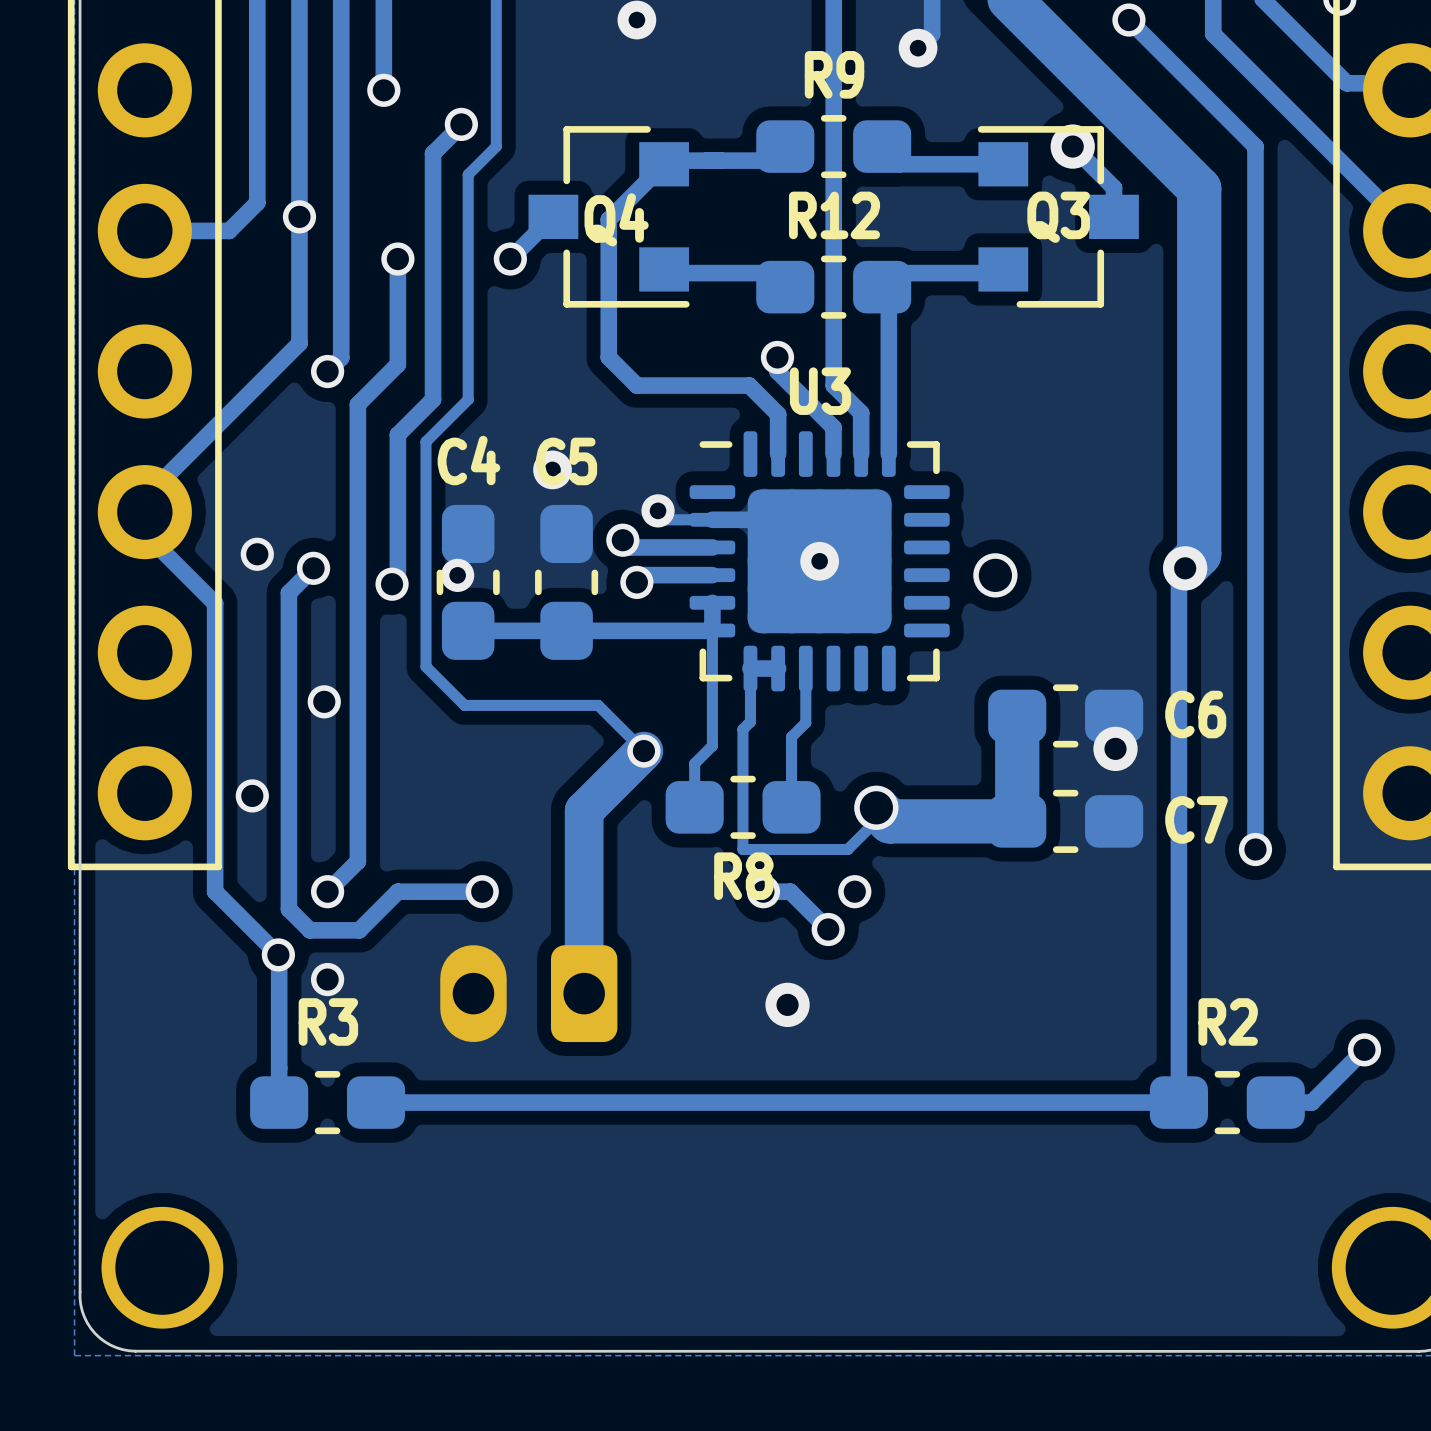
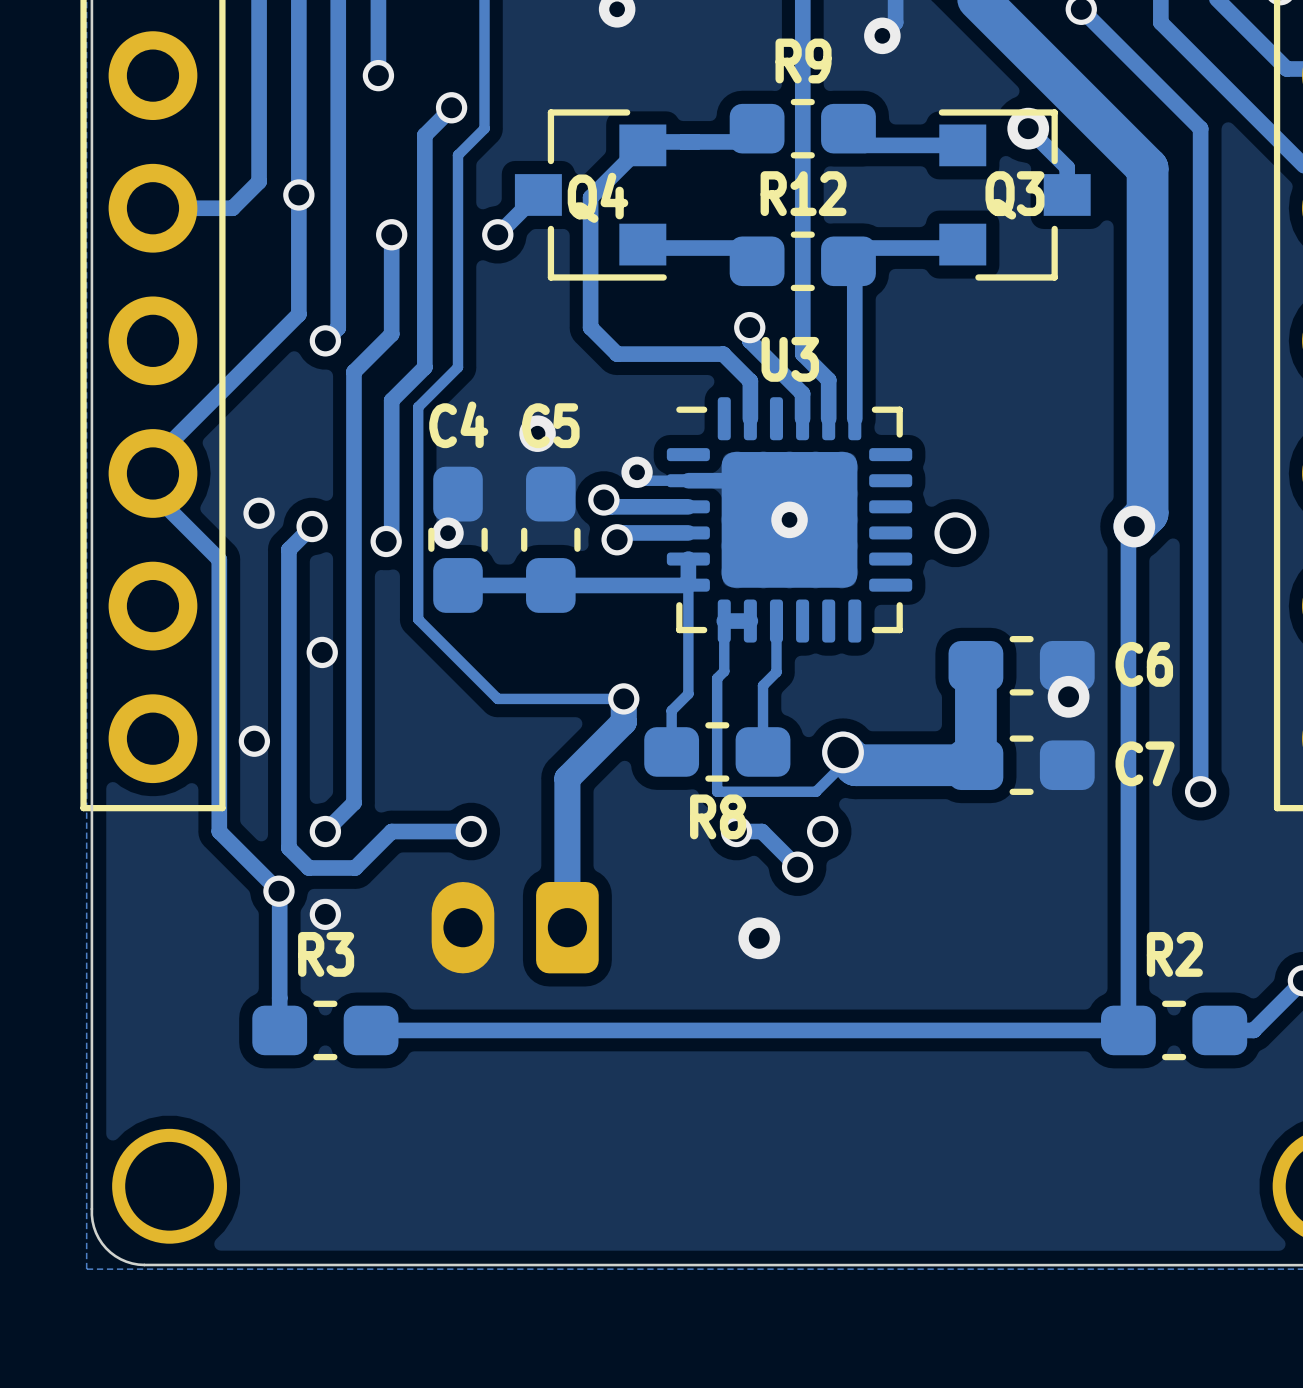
track: (464, 705) (598, 705) (643, 751) (584, 810) (584, 835) -> (454, 655) (497, 698) (623, 698) (623, 722) (567, 778)
track width: thick (584, 835) (584, 993) -> thin (567, 778) (567, 927)

